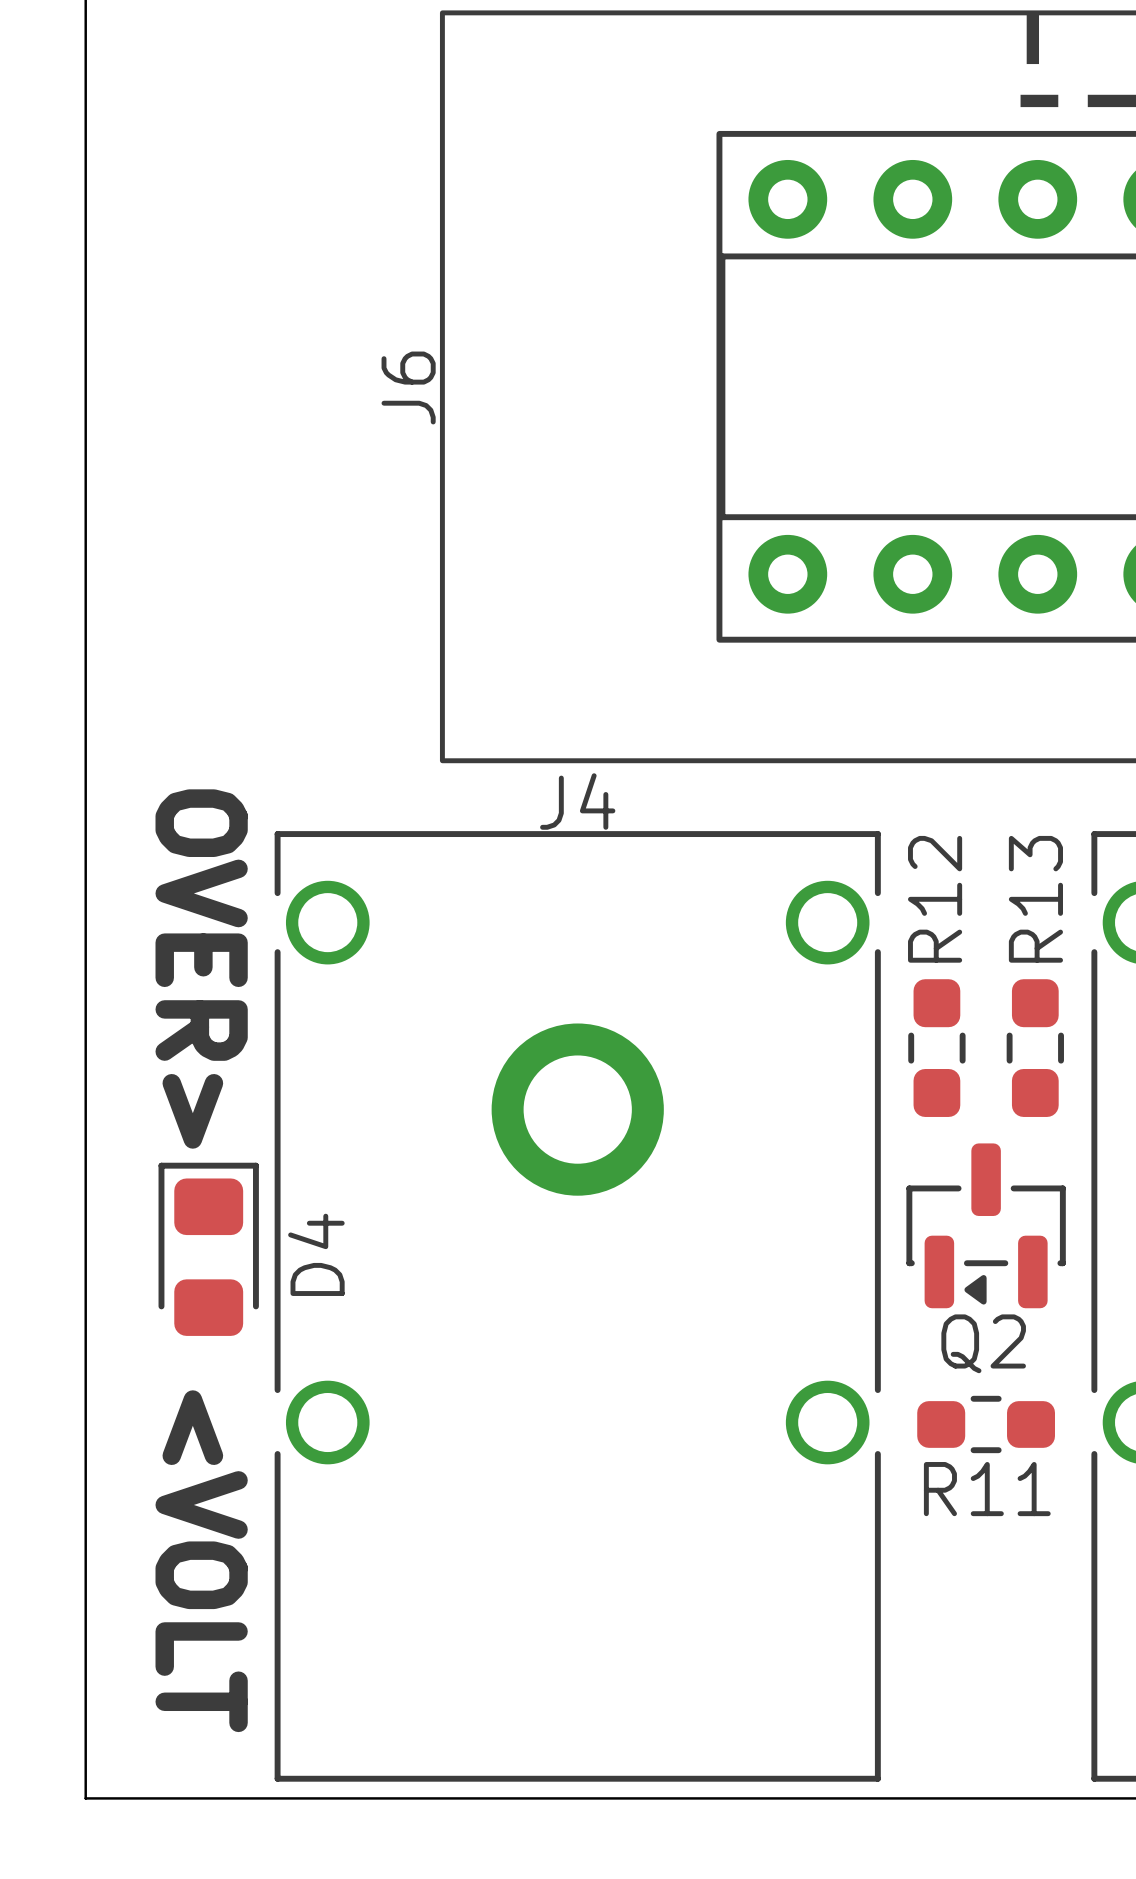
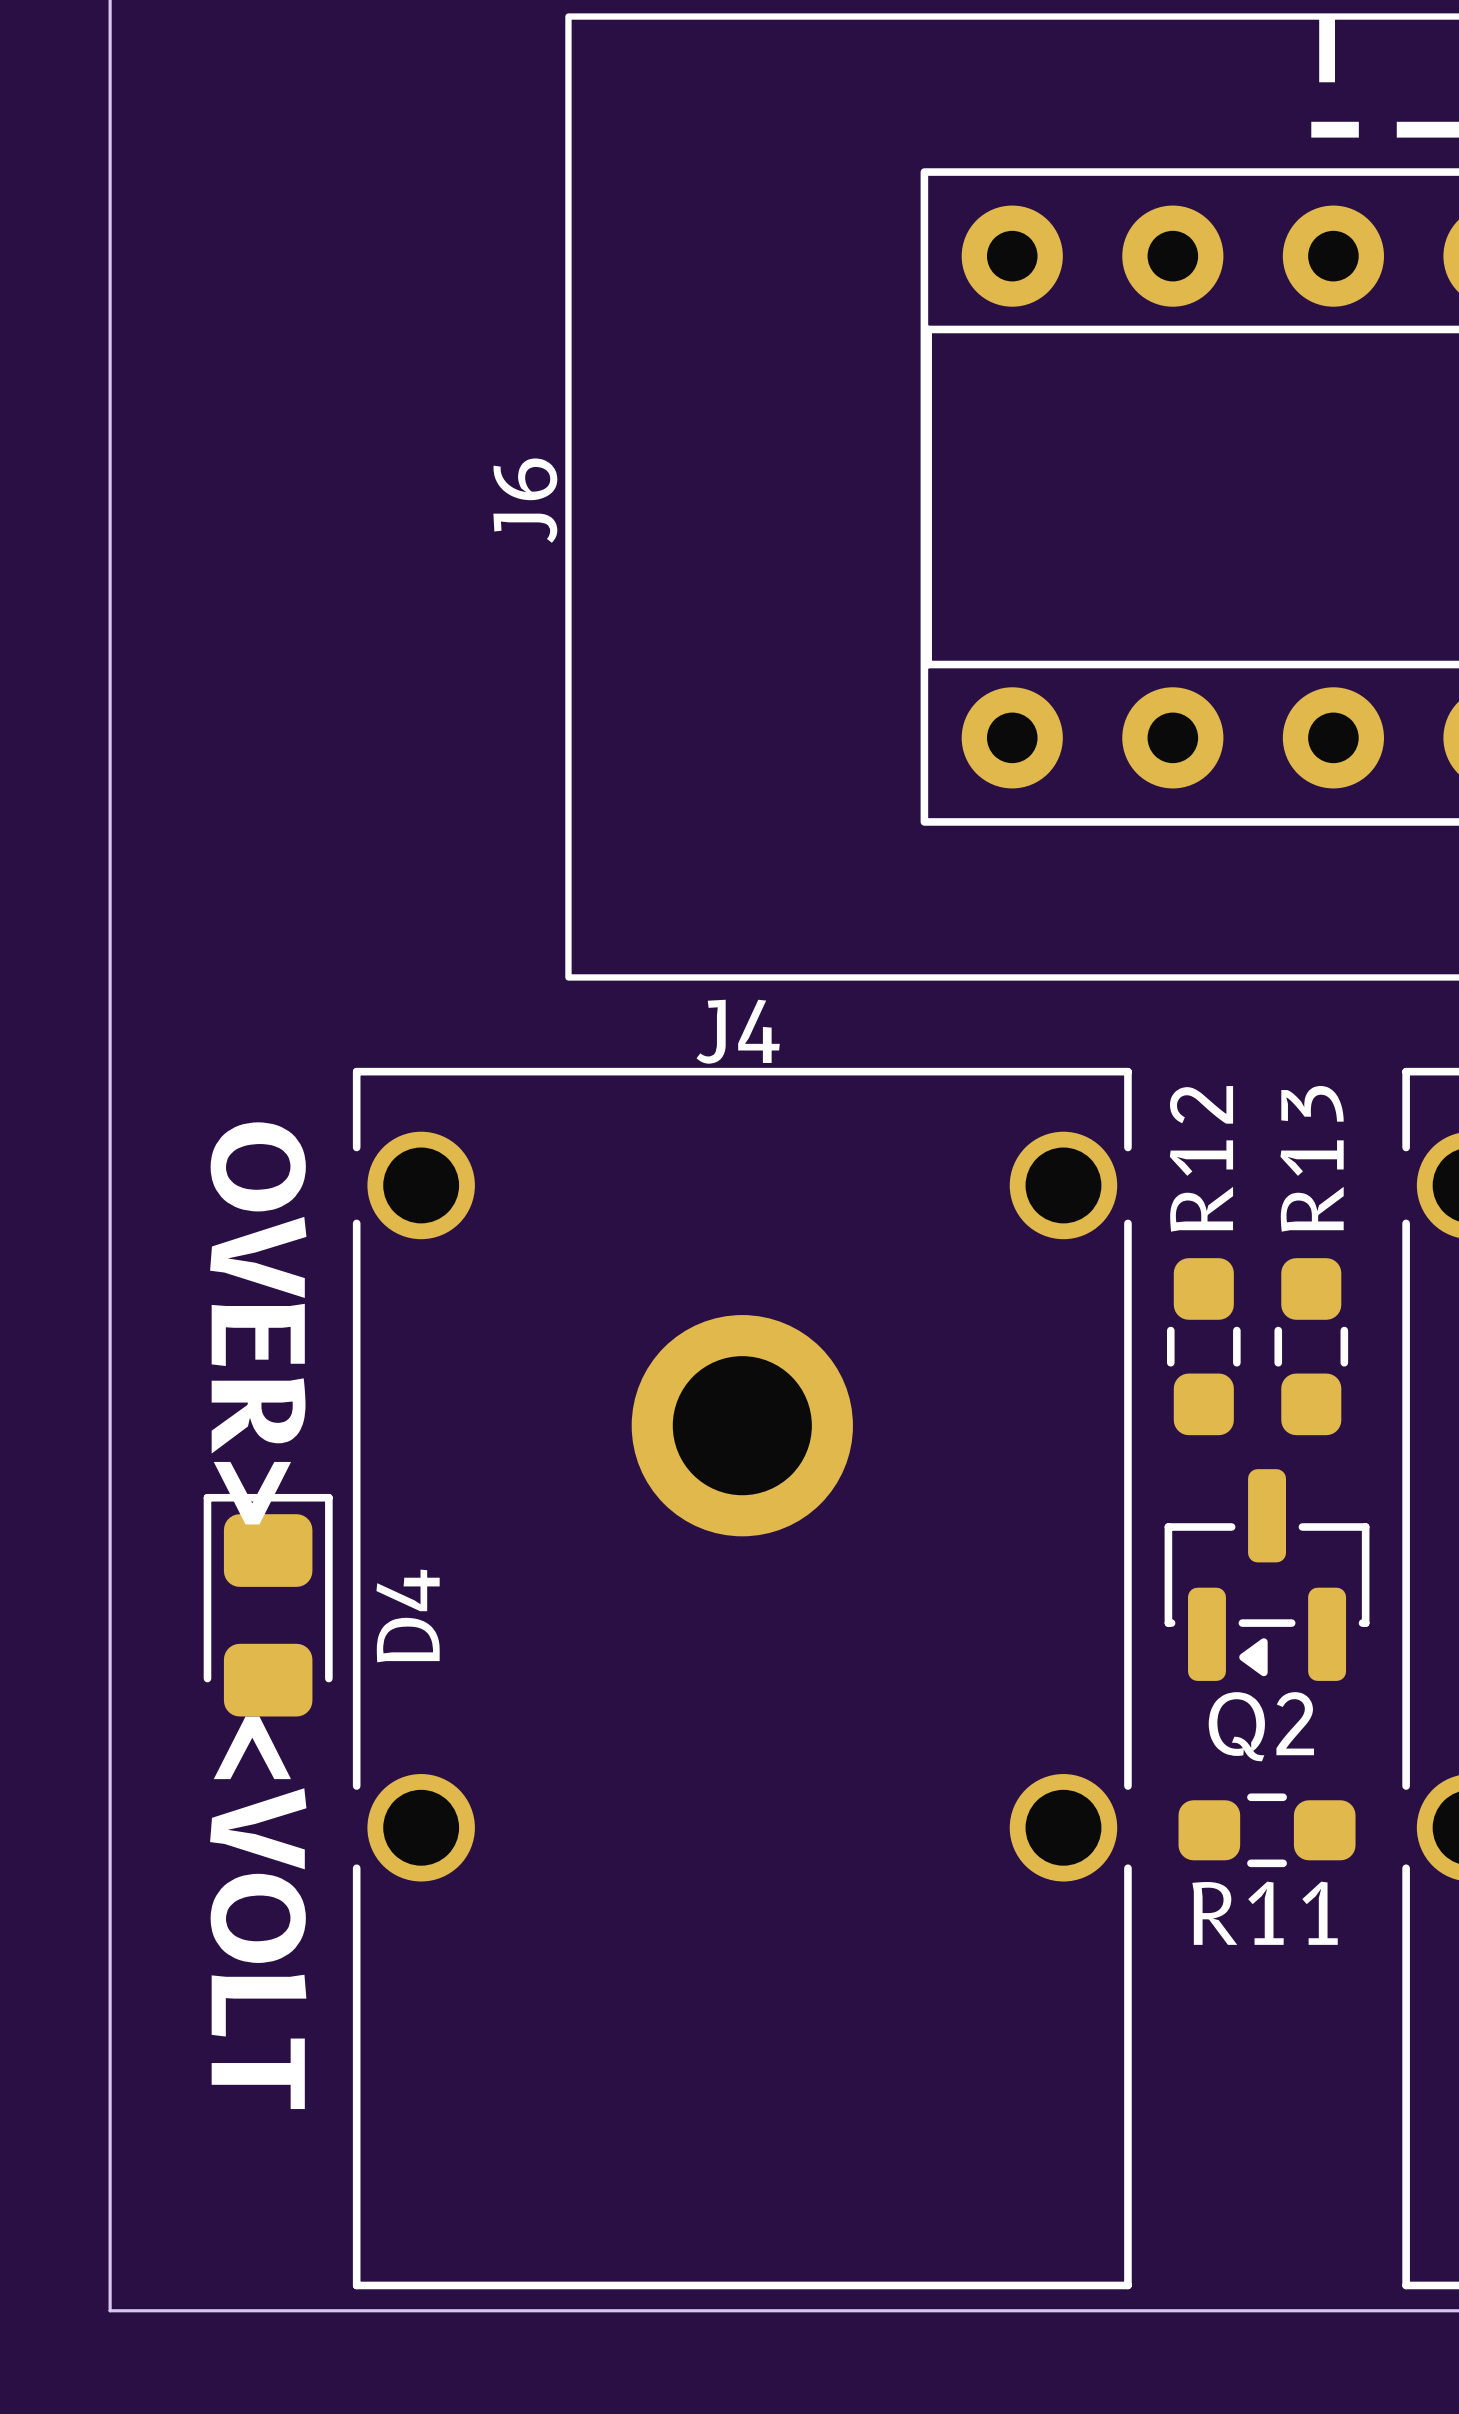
R13 position: (1035, 1048) -> (1311, 1346)

